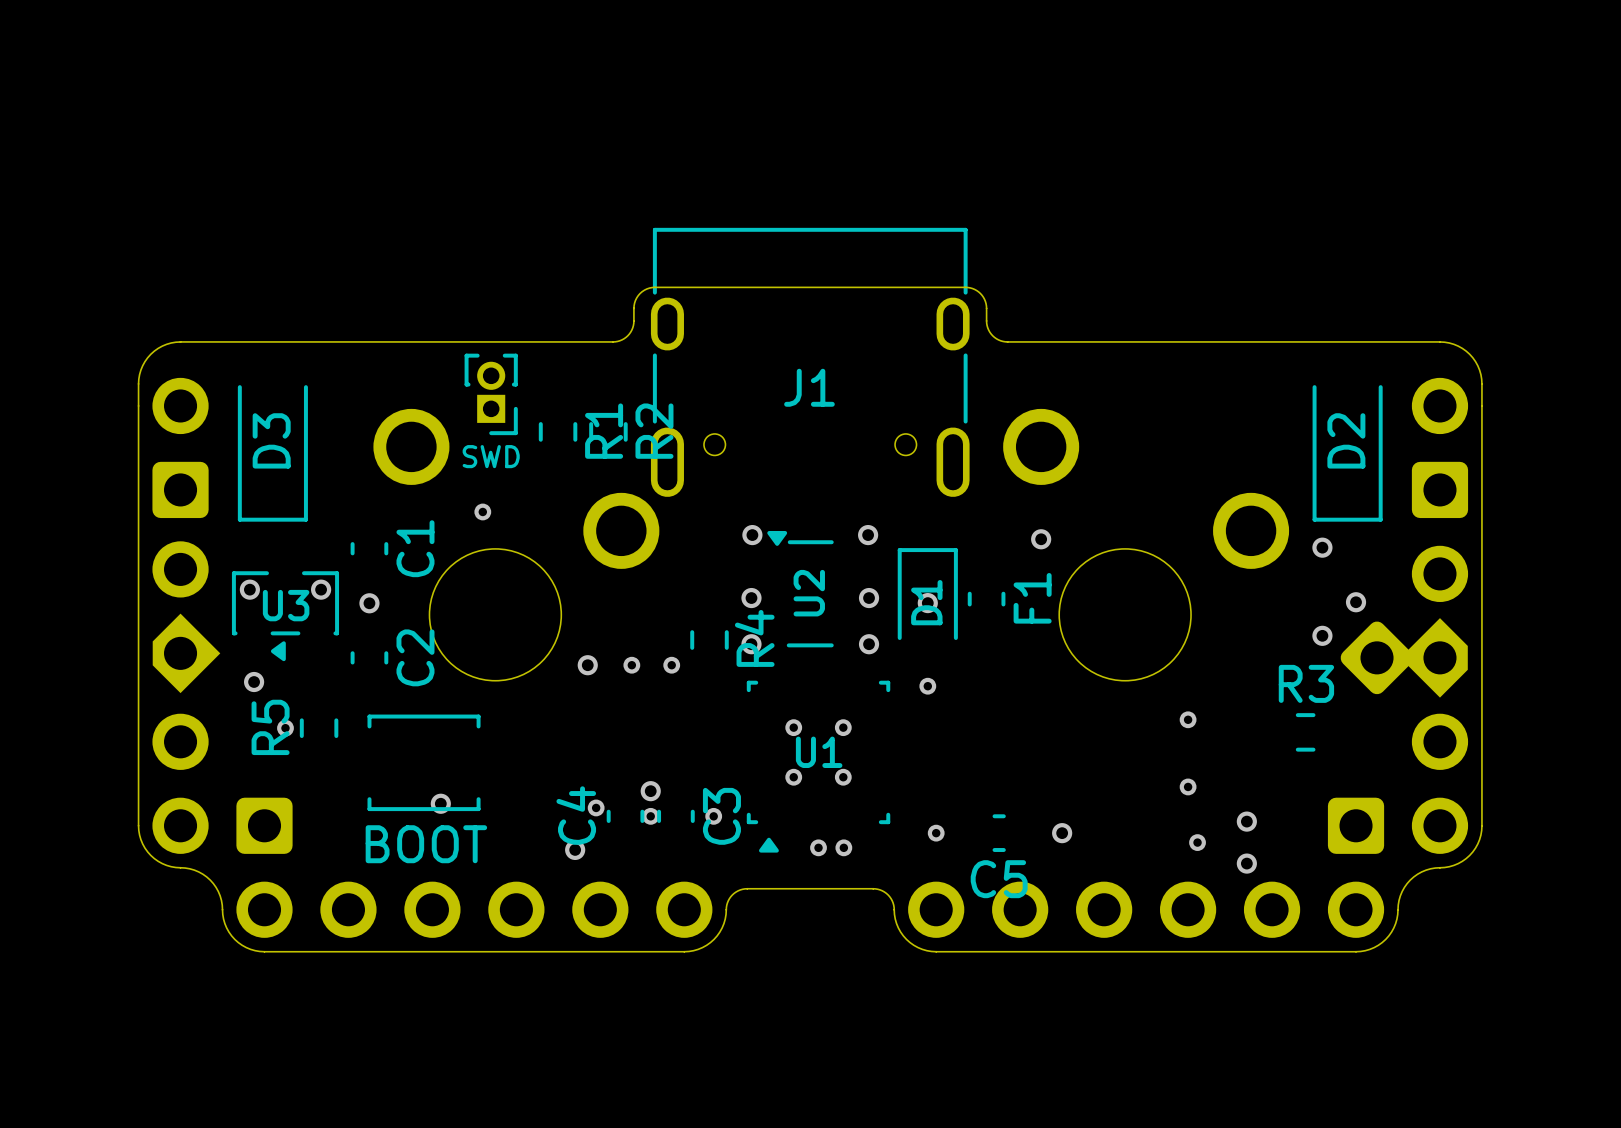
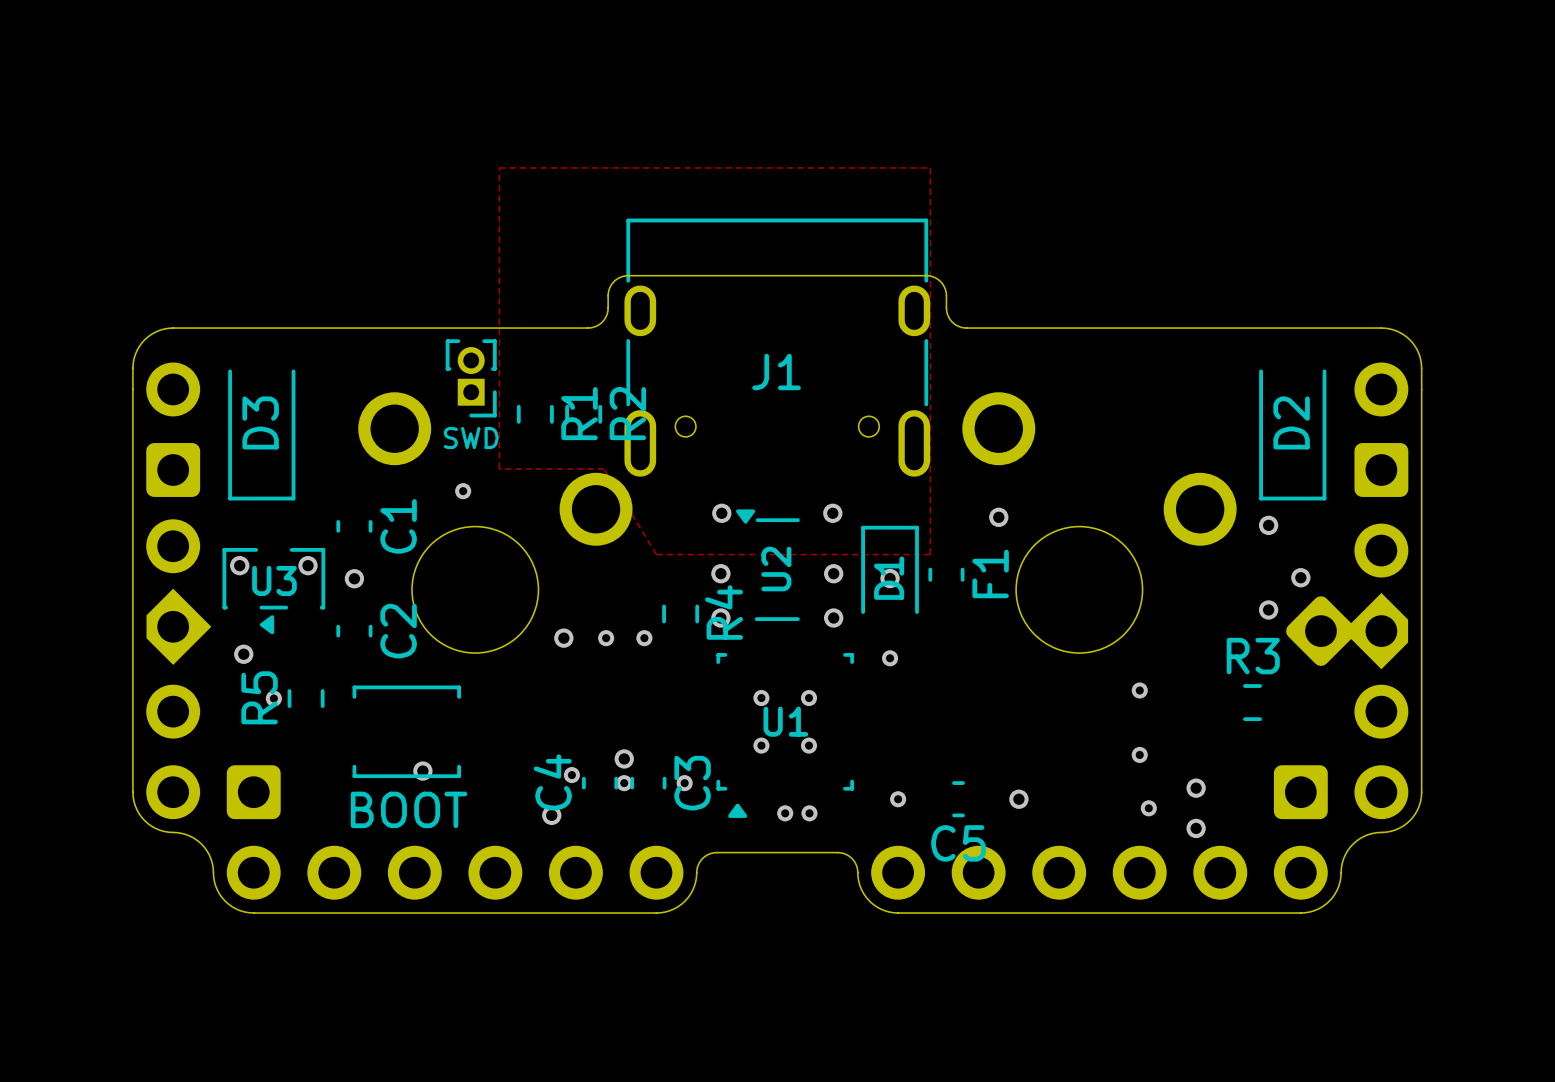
zone outline: none -> (499, 167) (499, 469) (604, 469) (656, 554) (930, 554) (930, 167) (499, 167)

